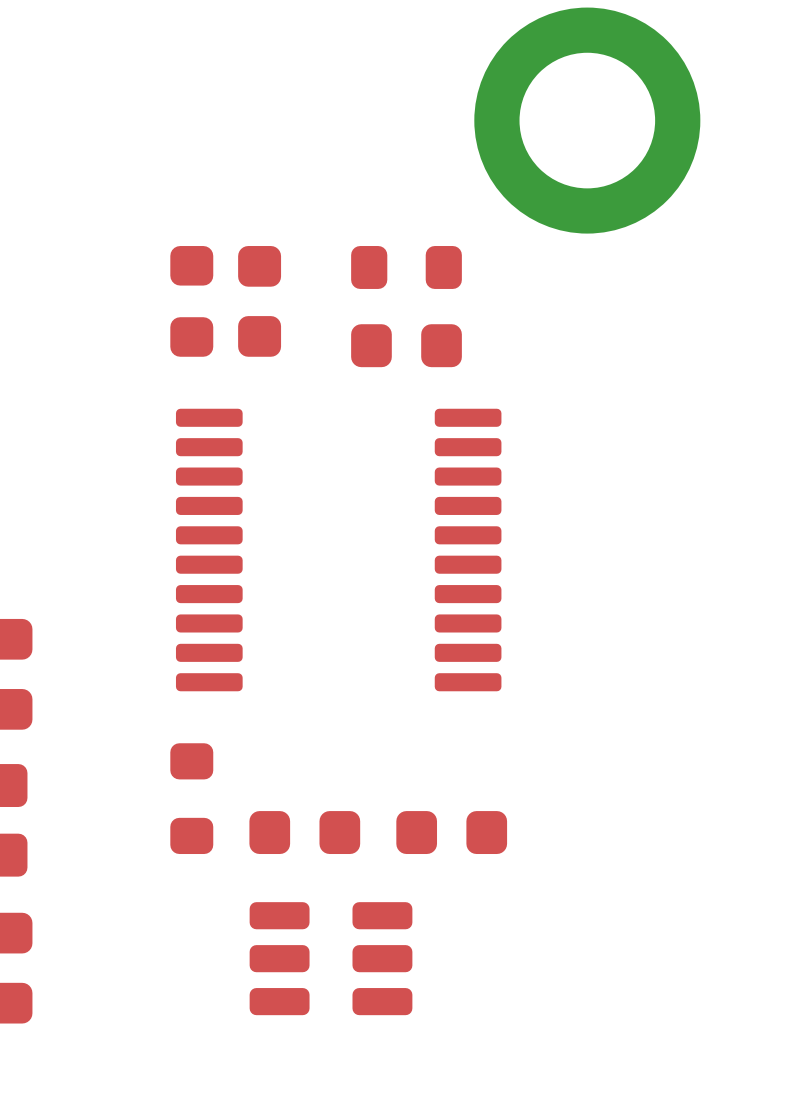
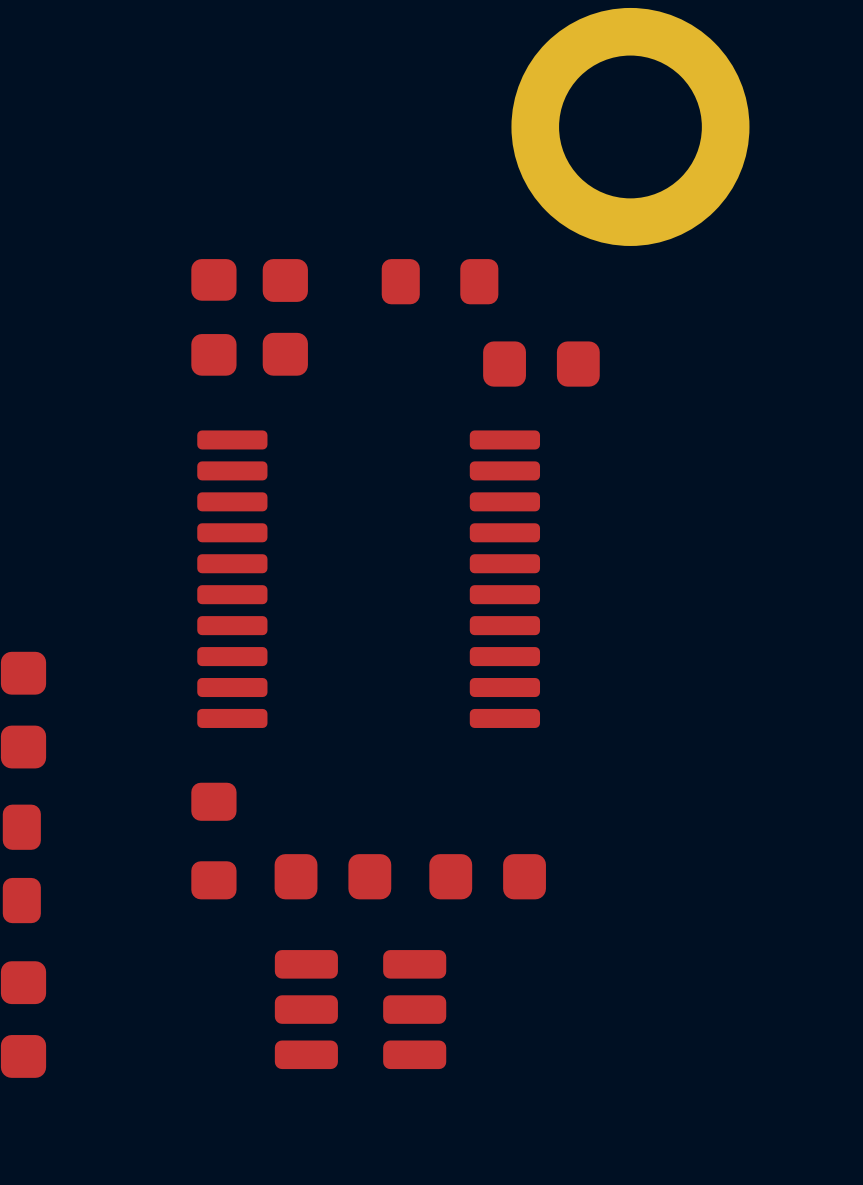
part position: (406, 345) -> (541, 364)

